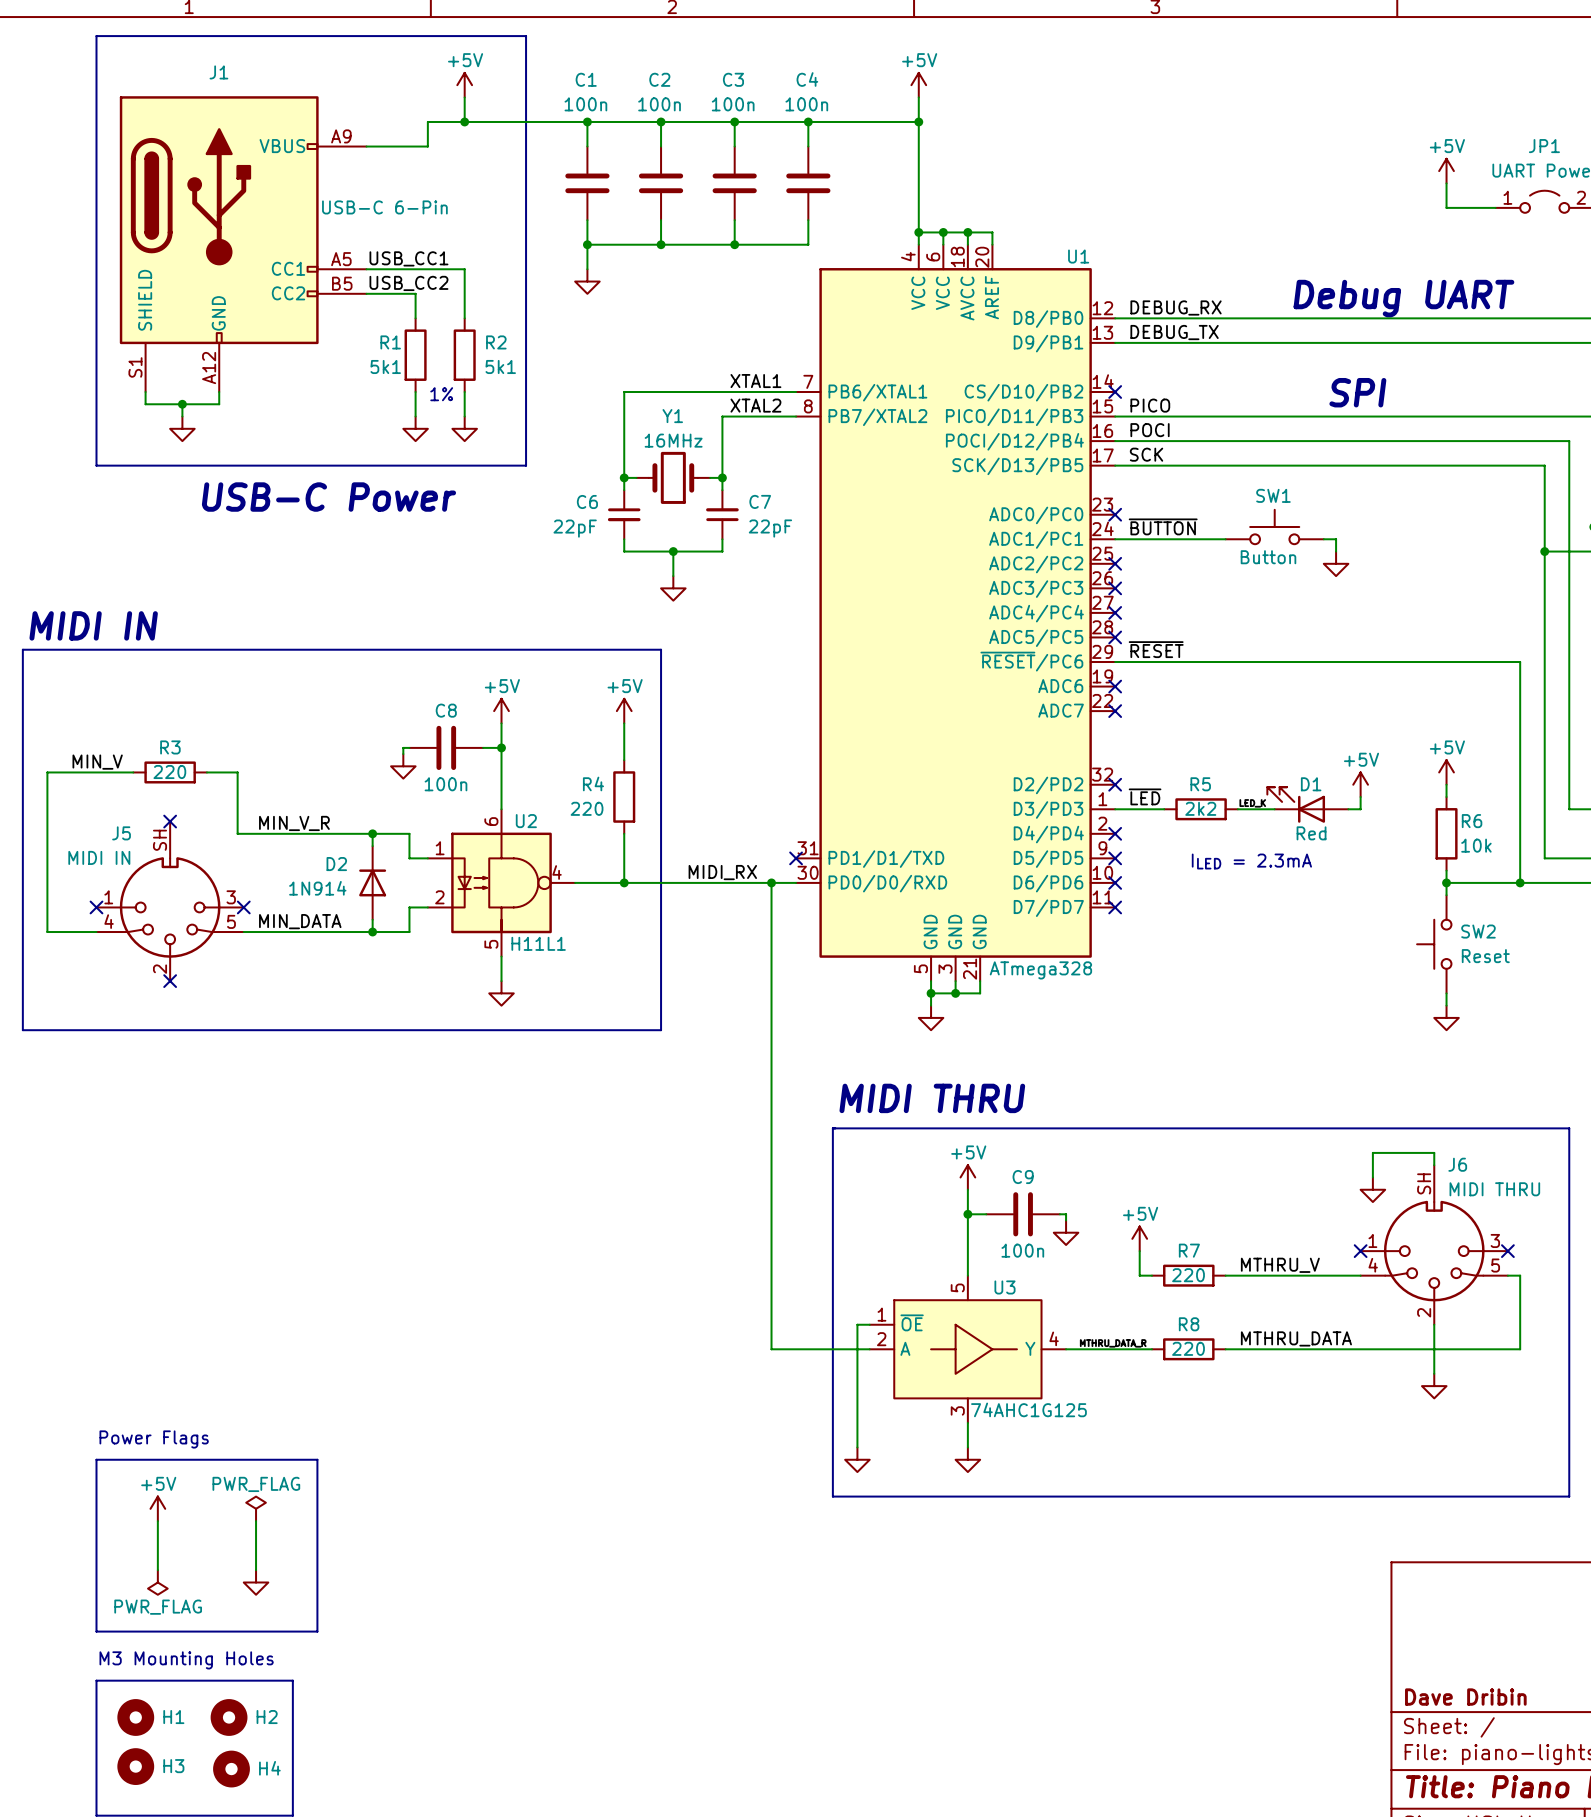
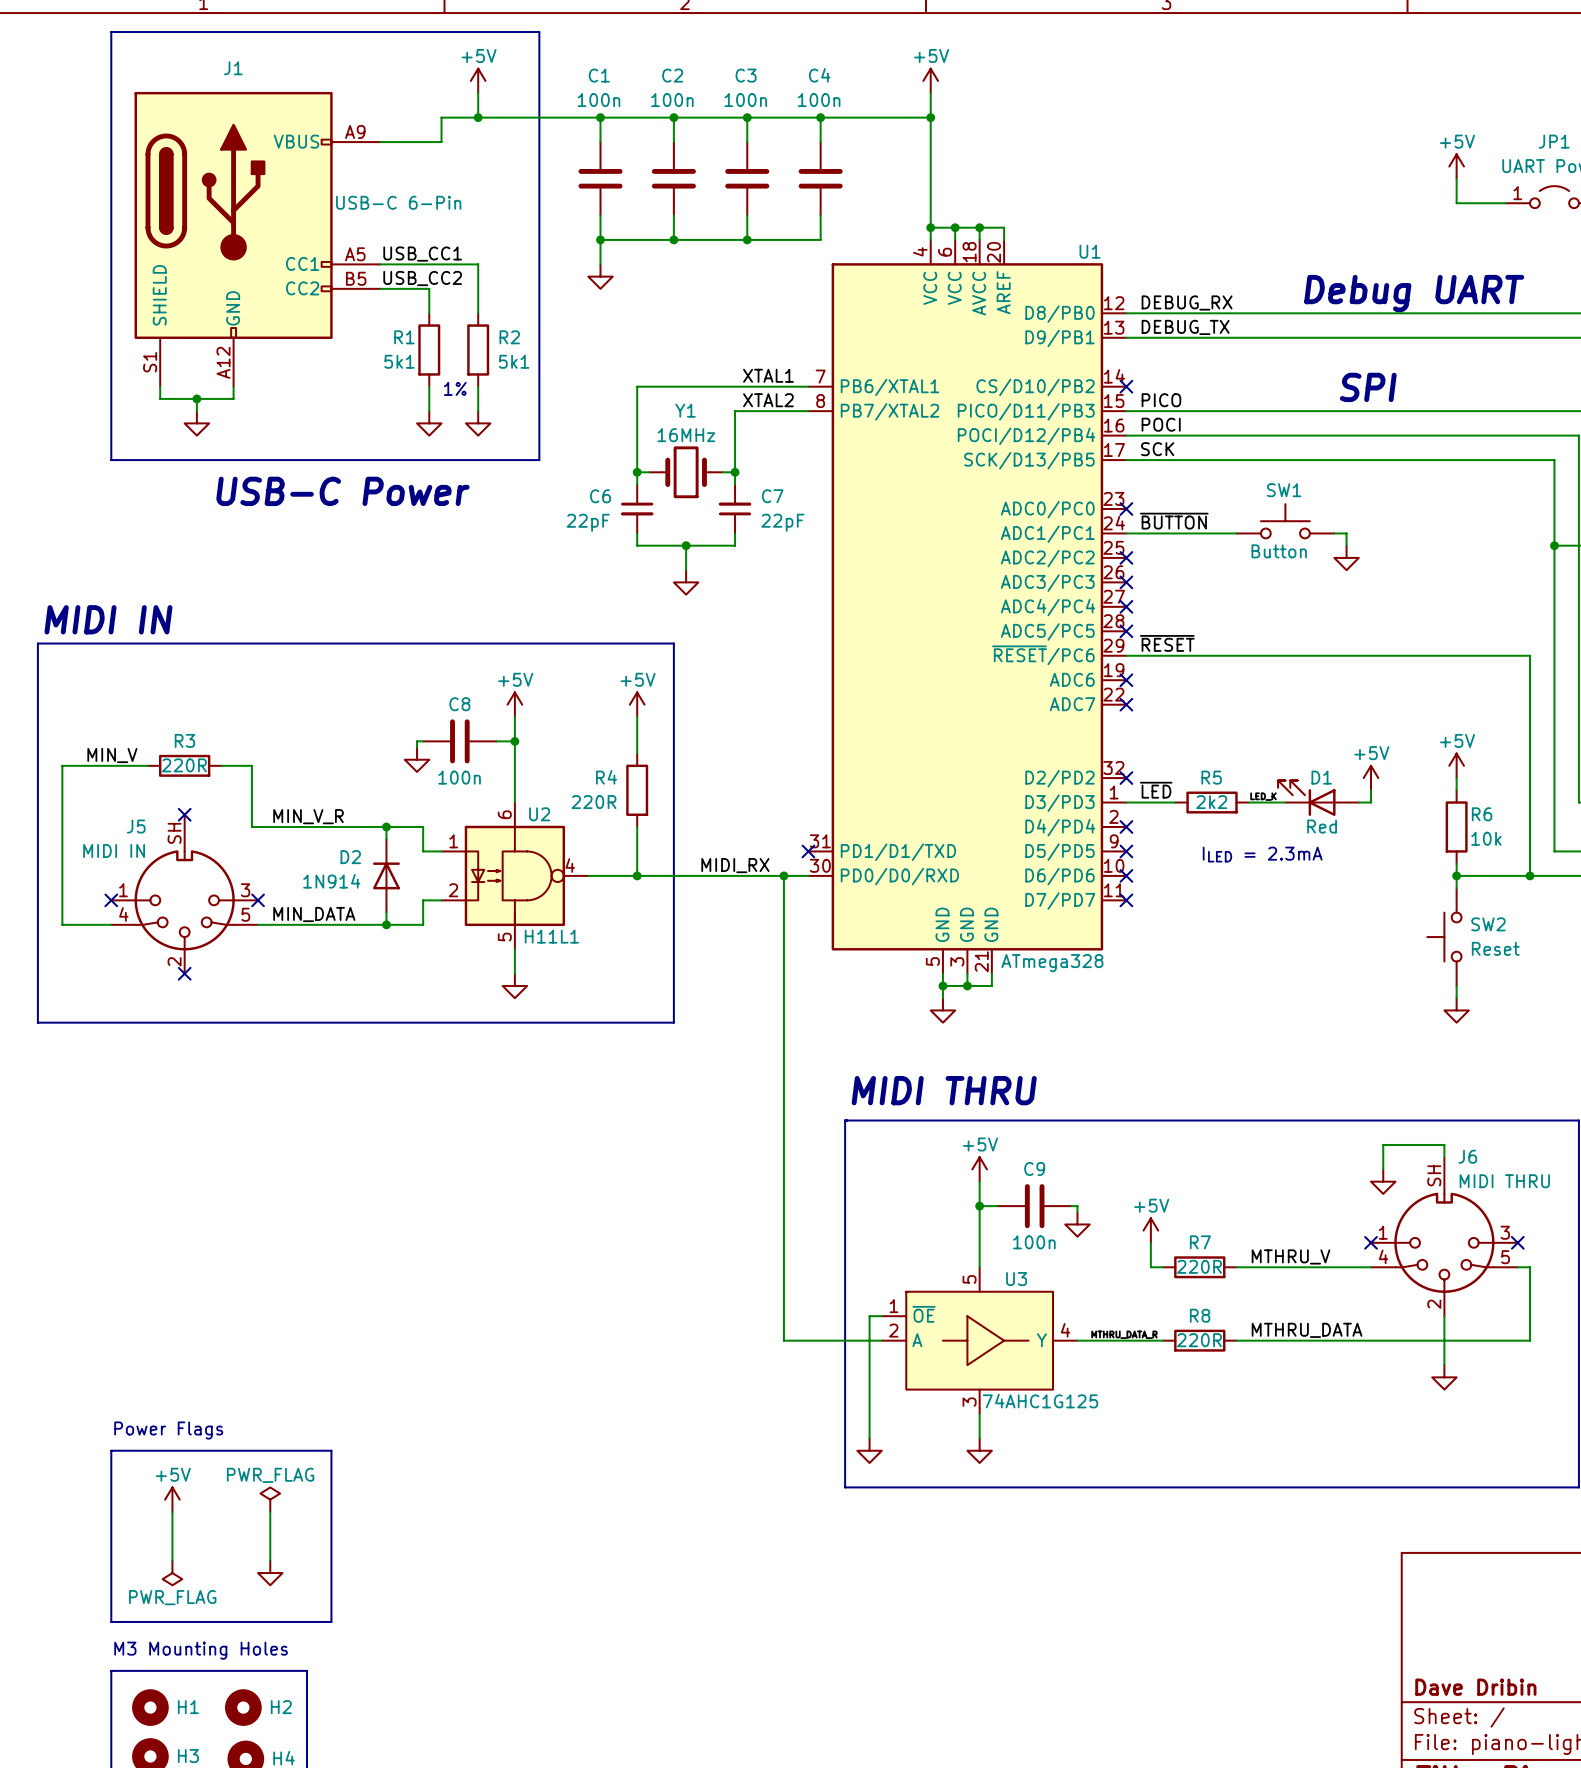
R3 value: 220 (169, 772) -> 220R (184, 765)
R4 value: 220 (587, 808) -> 220R (594, 802)
R7 value: 220 (1188, 1275) -> 220R (1199, 1266)
R8 value: 220 (1188, 1348) -> 220R (1199, 1340)

